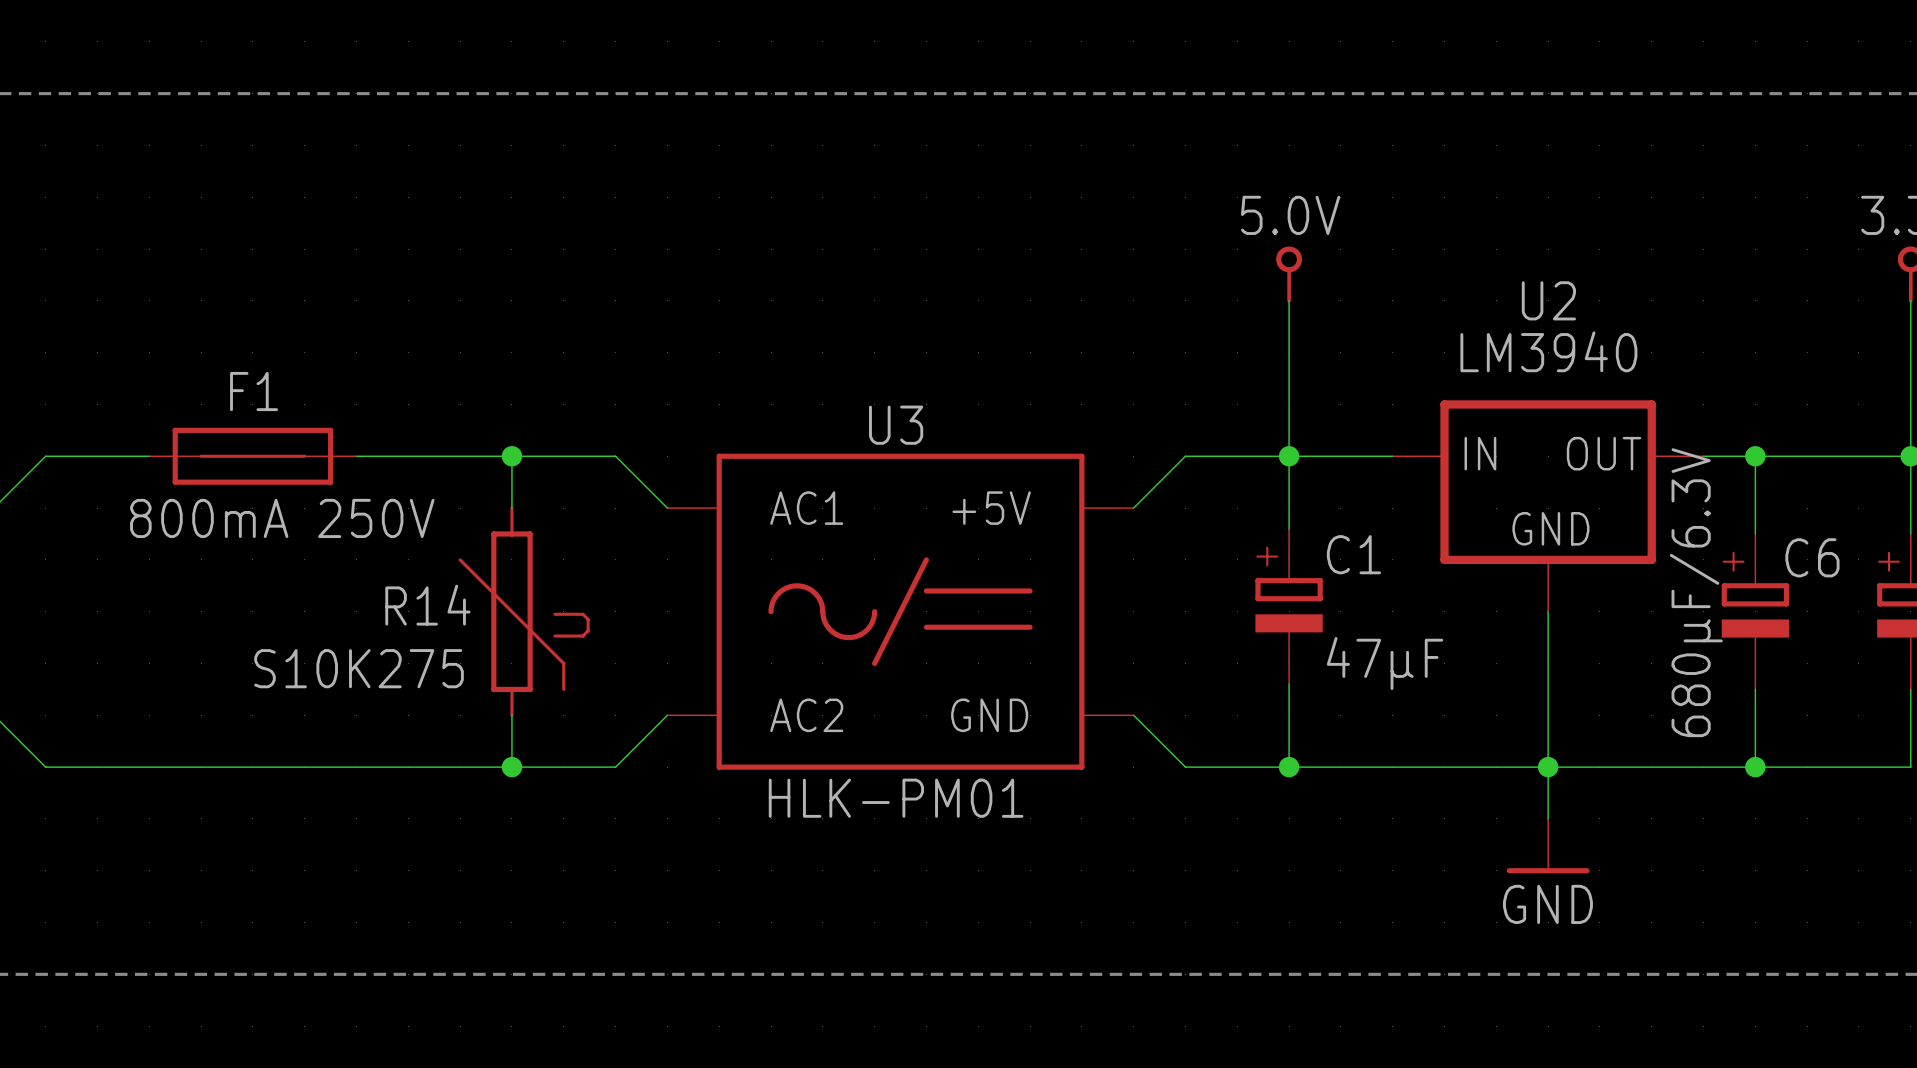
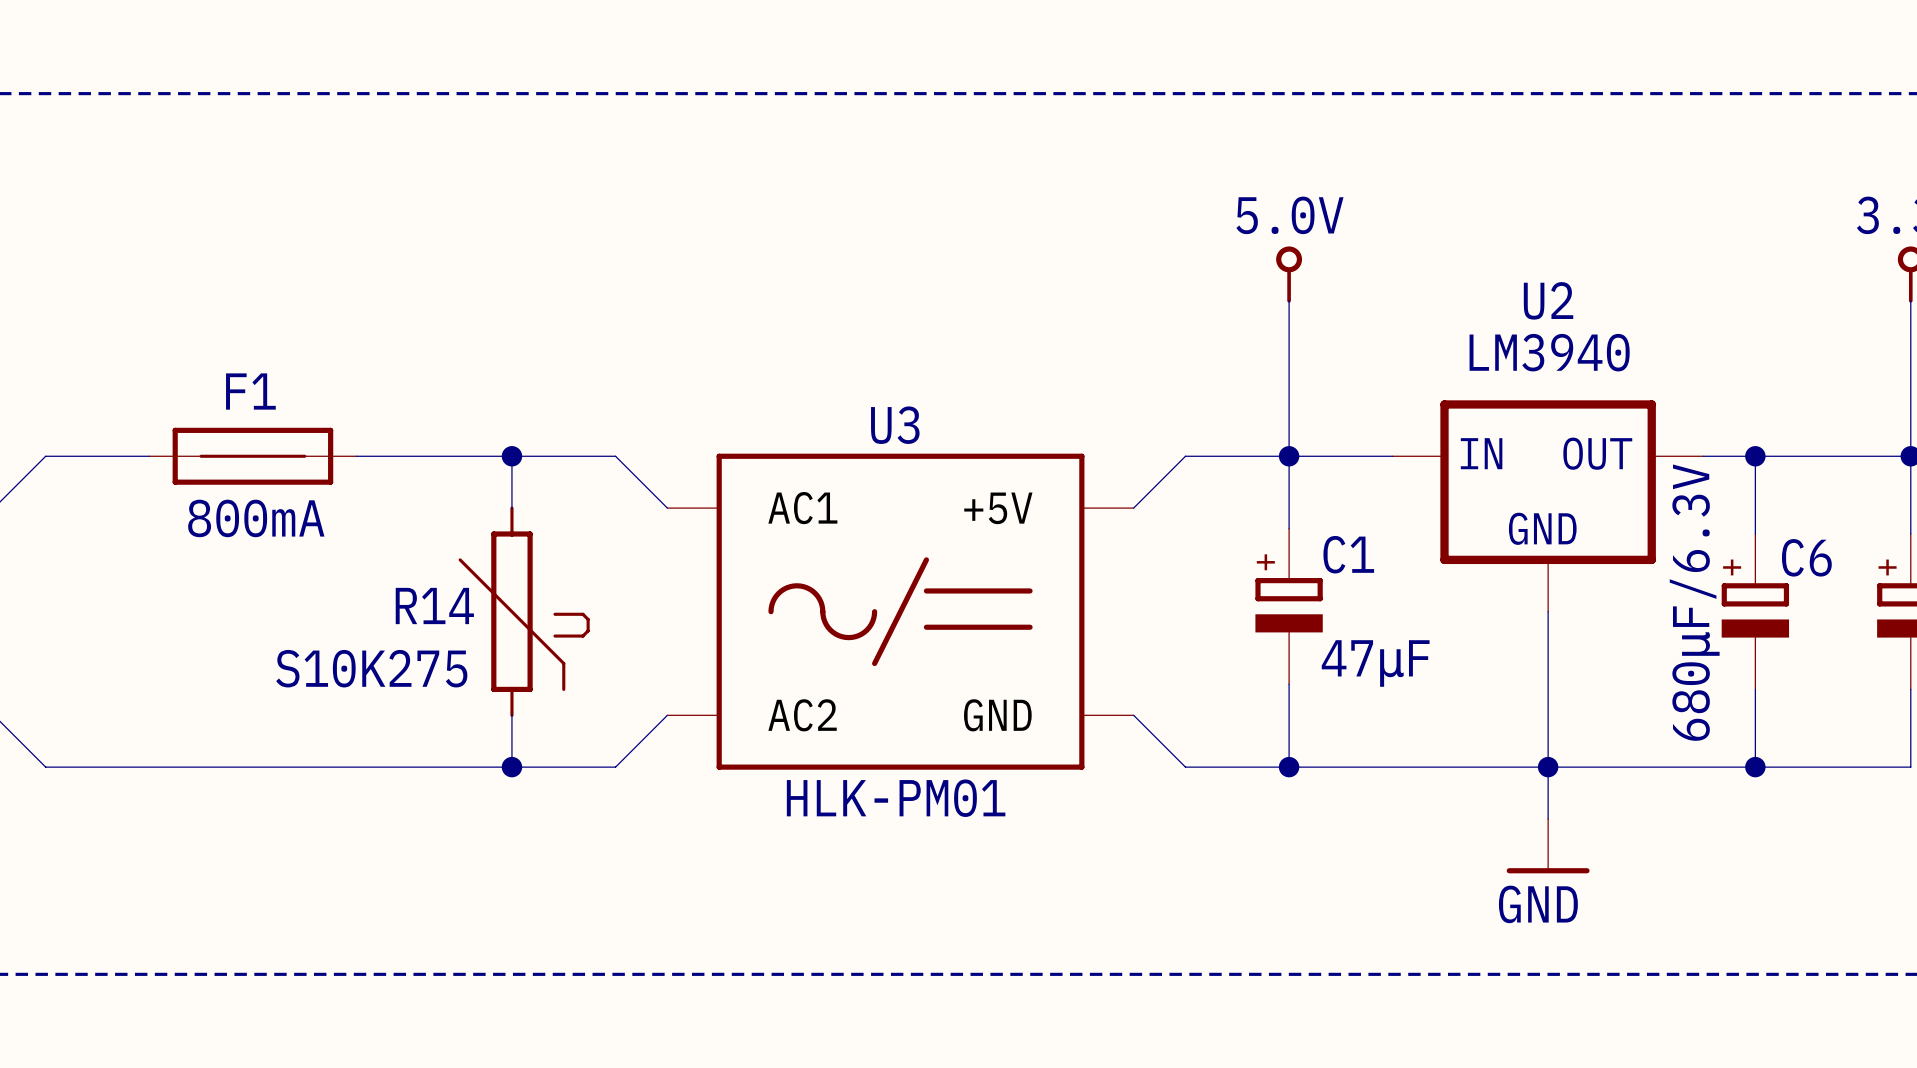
F1 value: 800mA 250V (282, 518) -> 800mA (256, 518)

